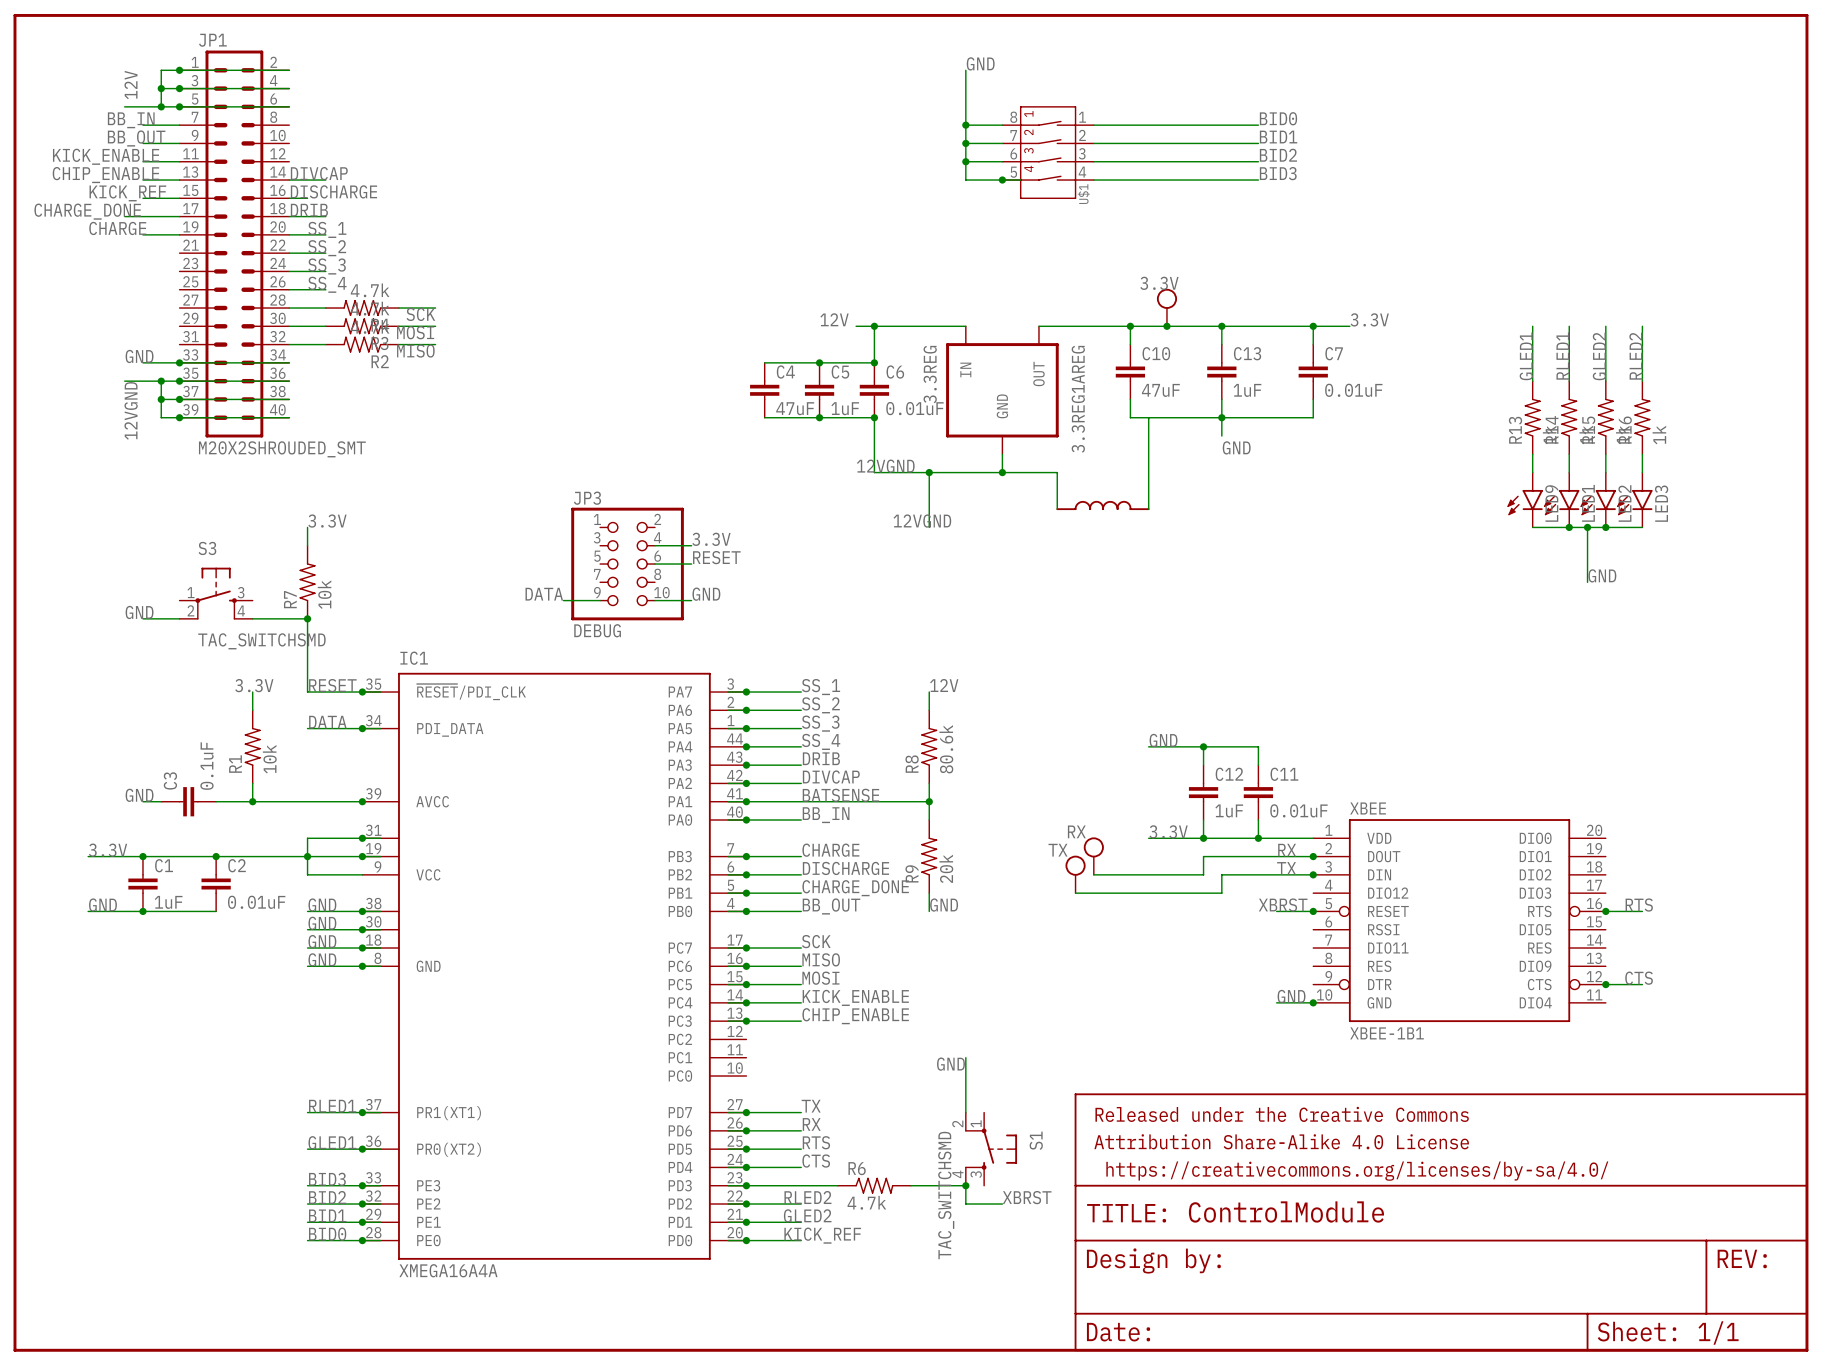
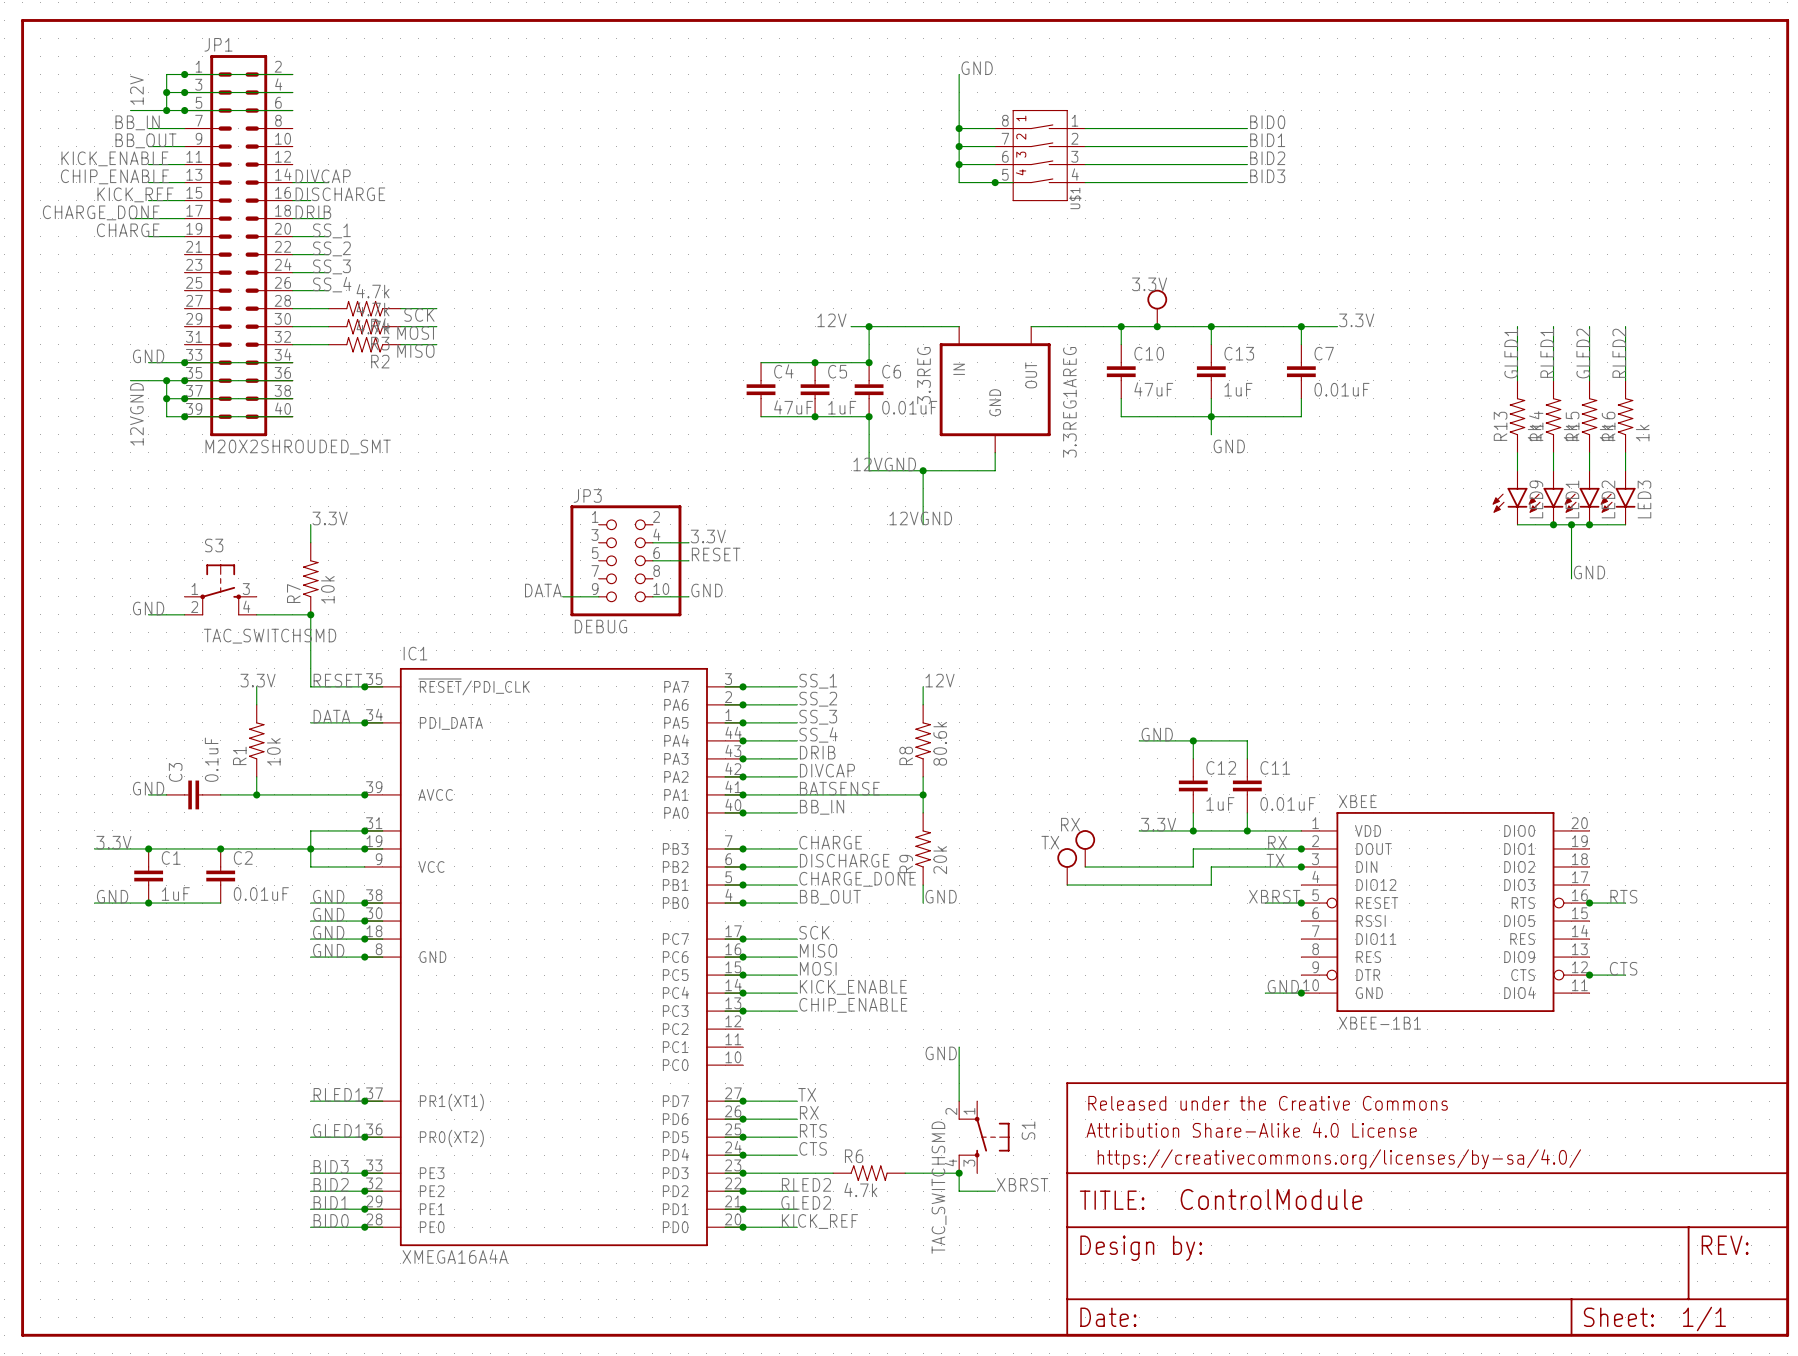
wire: (1148, 417) (1148, 509) -> none
wire: (1002, 472) (1057, 472) (1057, 509) -> none
junction: (1002, 472) -> none
part: (1102, 505) -> none

